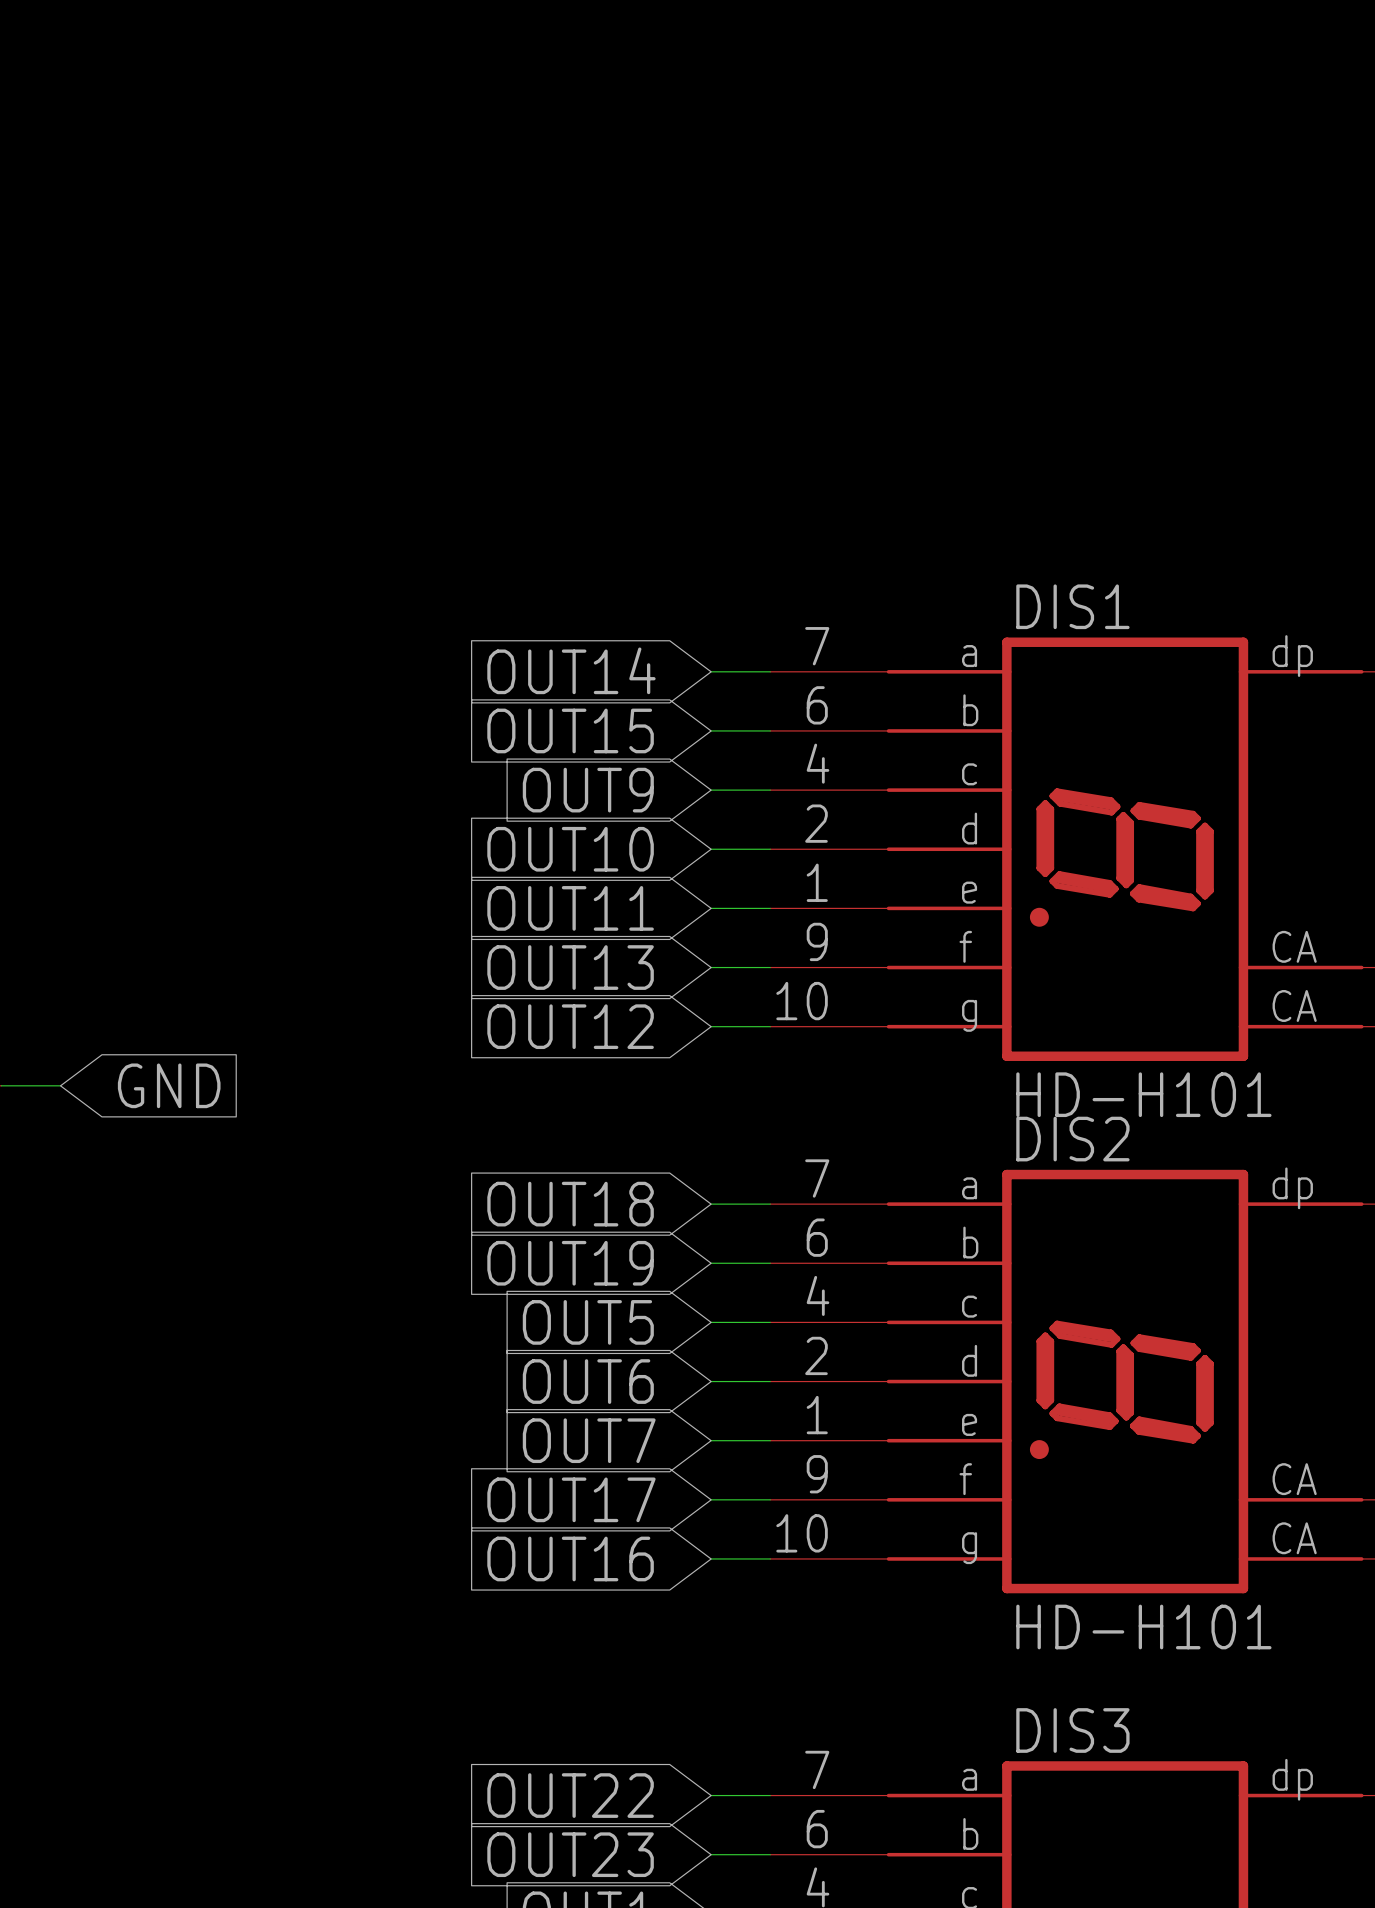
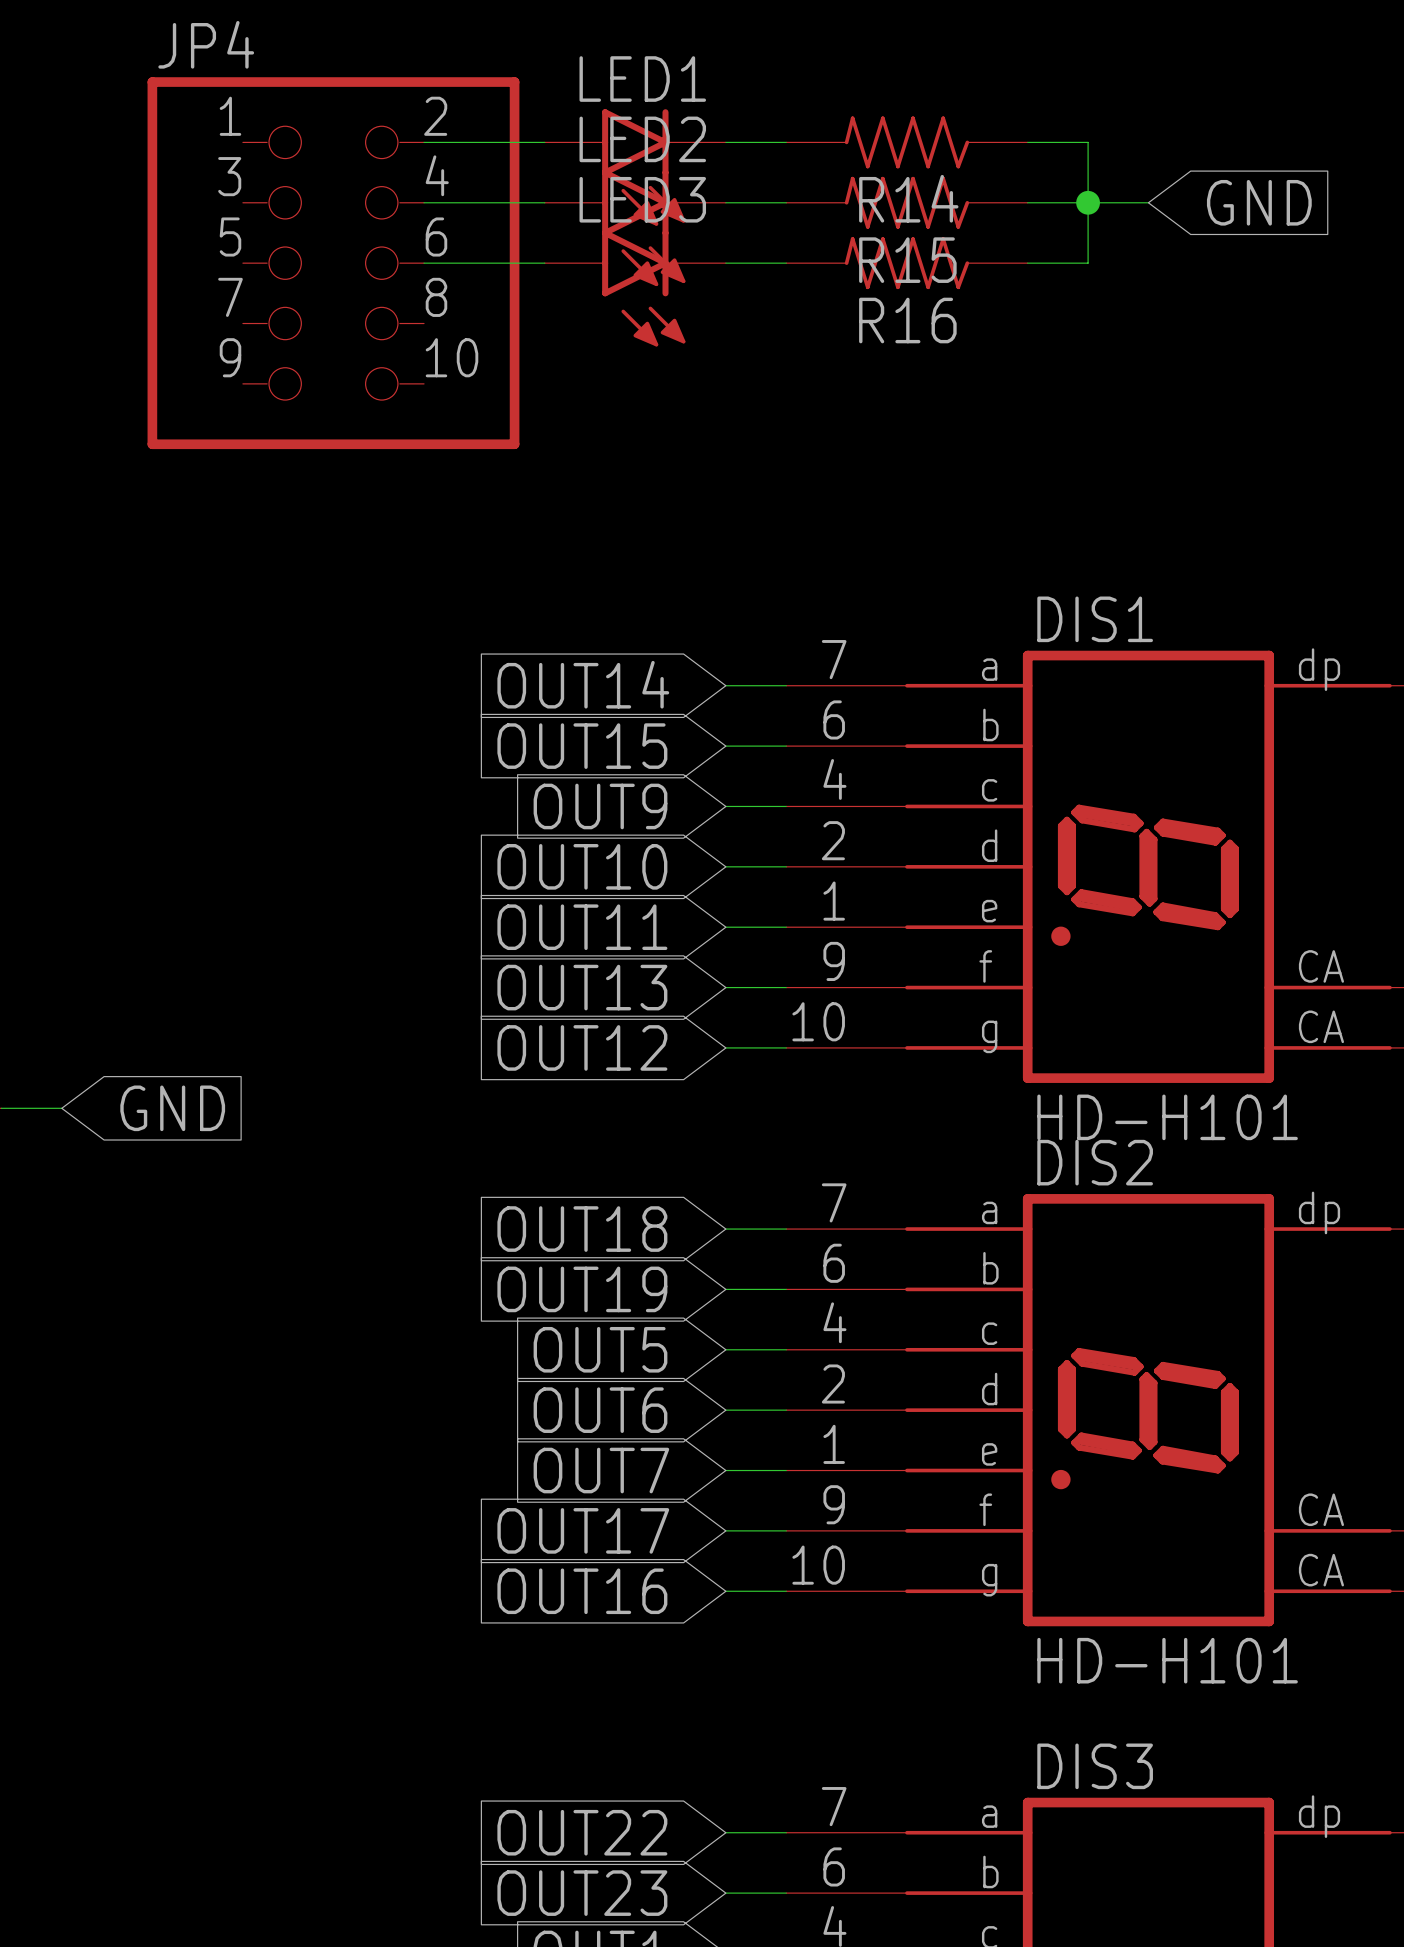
wire: none -> (424, 142) (544, 142)
wire: none -> (725, 142) (786, 142)
R14: none -> (906, 142)
wire: none -> (1027, 142) (1088, 142) (1088, 263) (1027, 263)
LED1: none -> (635, 167)
wire: none -> (424, 202) (544, 202)
wire: none -> (725, 202) (786, 202)
R15: none -> (906, 202)
wire: none -> (1027, 202) (1148, 202)
junction: none -> (1088, 202)
global label: none -> GND (1259, 202)
LED2: none -> (635, 227)
JP4: none -> (333, 263)
wire: none -> (424, 263) (544, 263)
wire: none -> (725, 263) (786, 263)
R16: none -> (906, 263)
LED3: none -> (635, 288)

